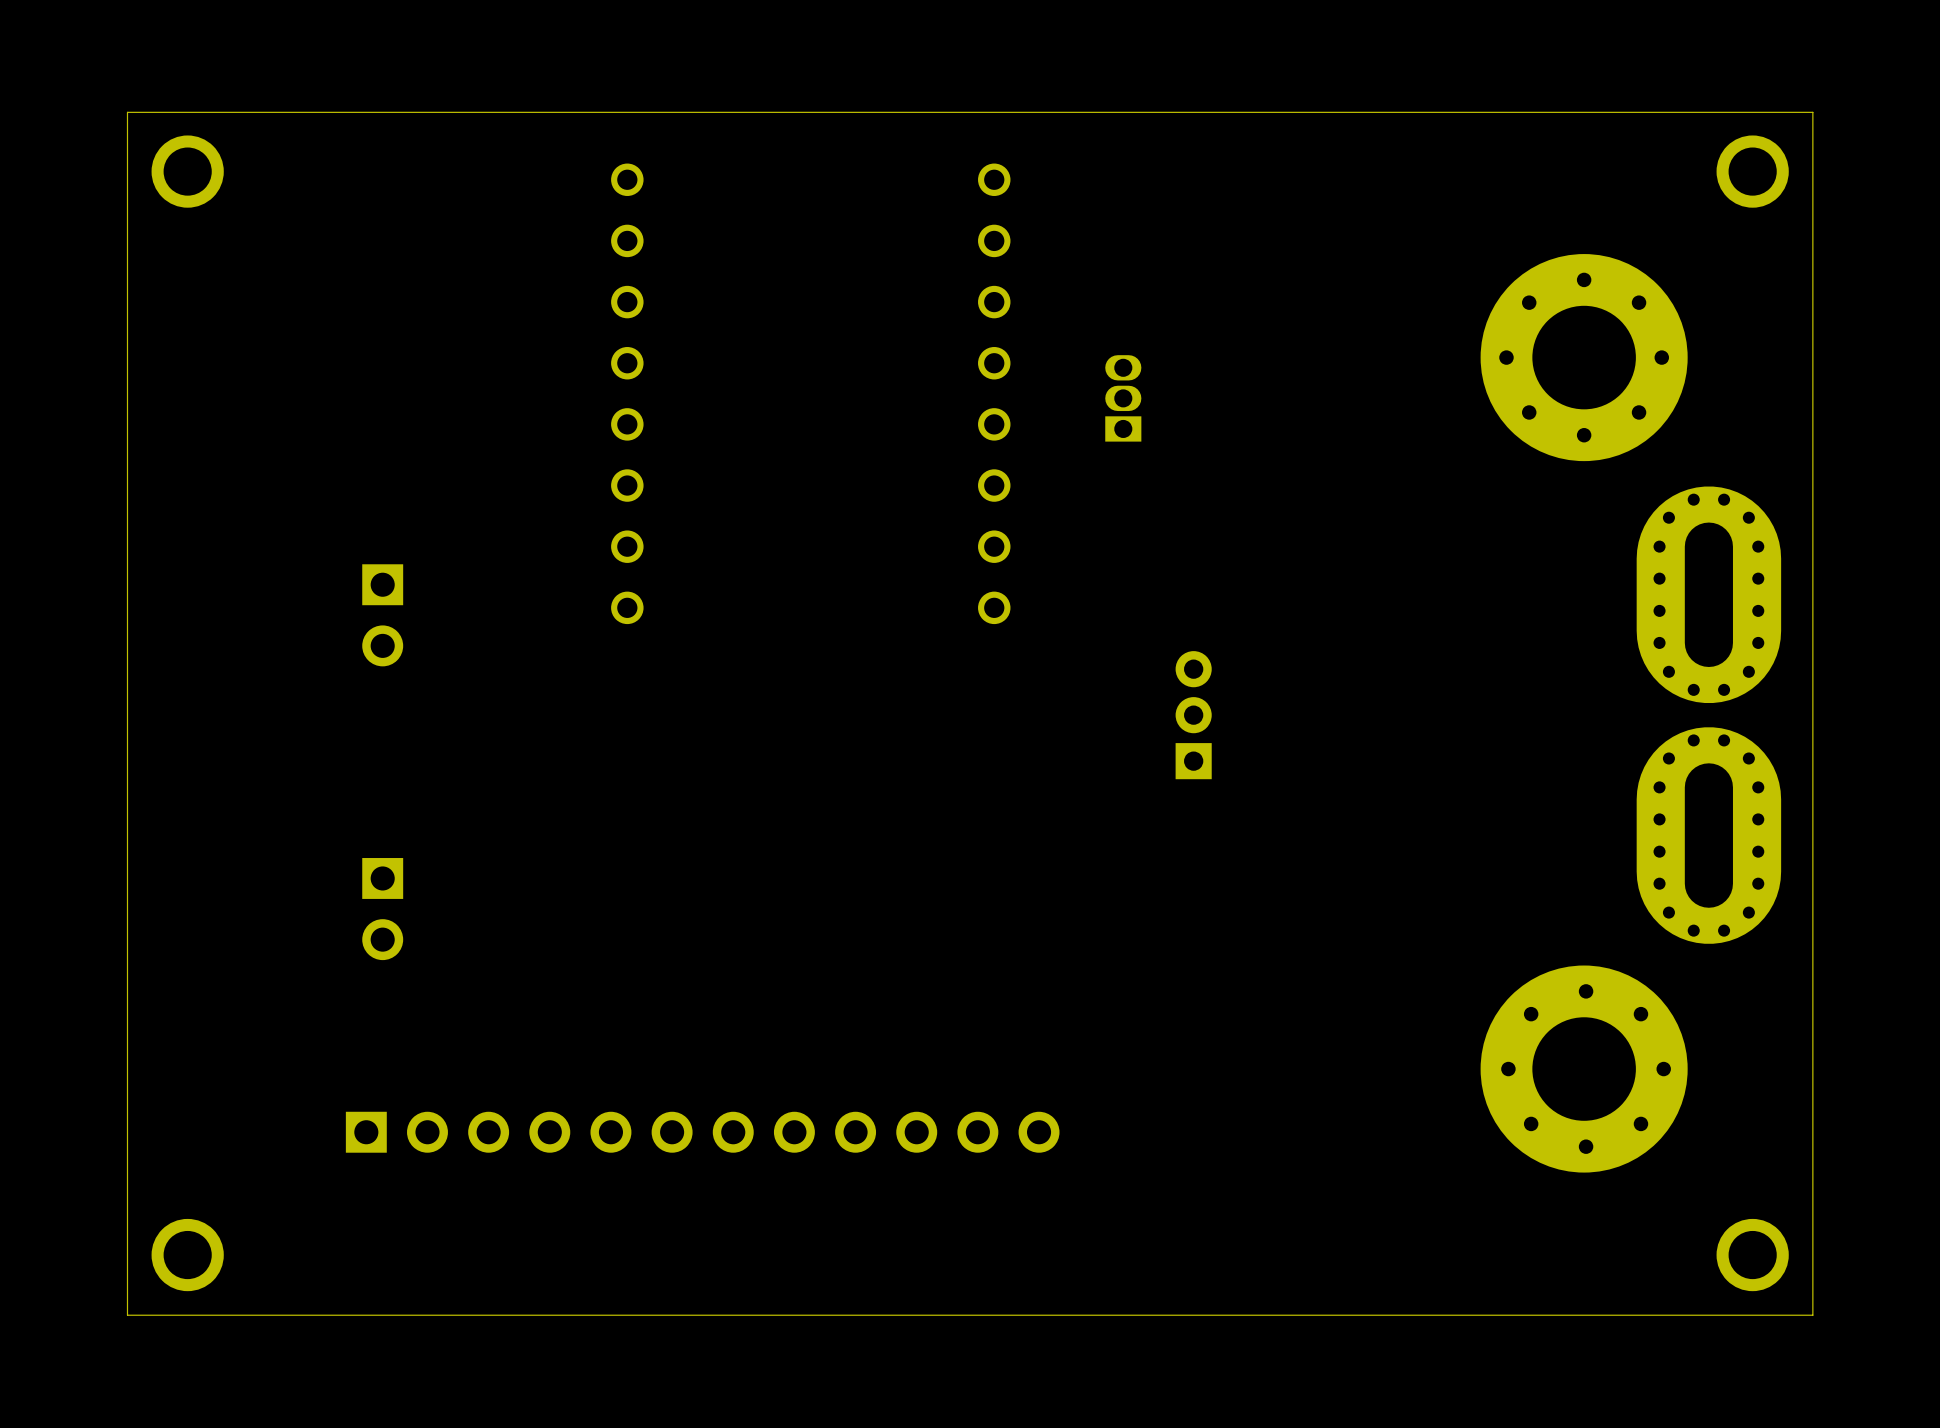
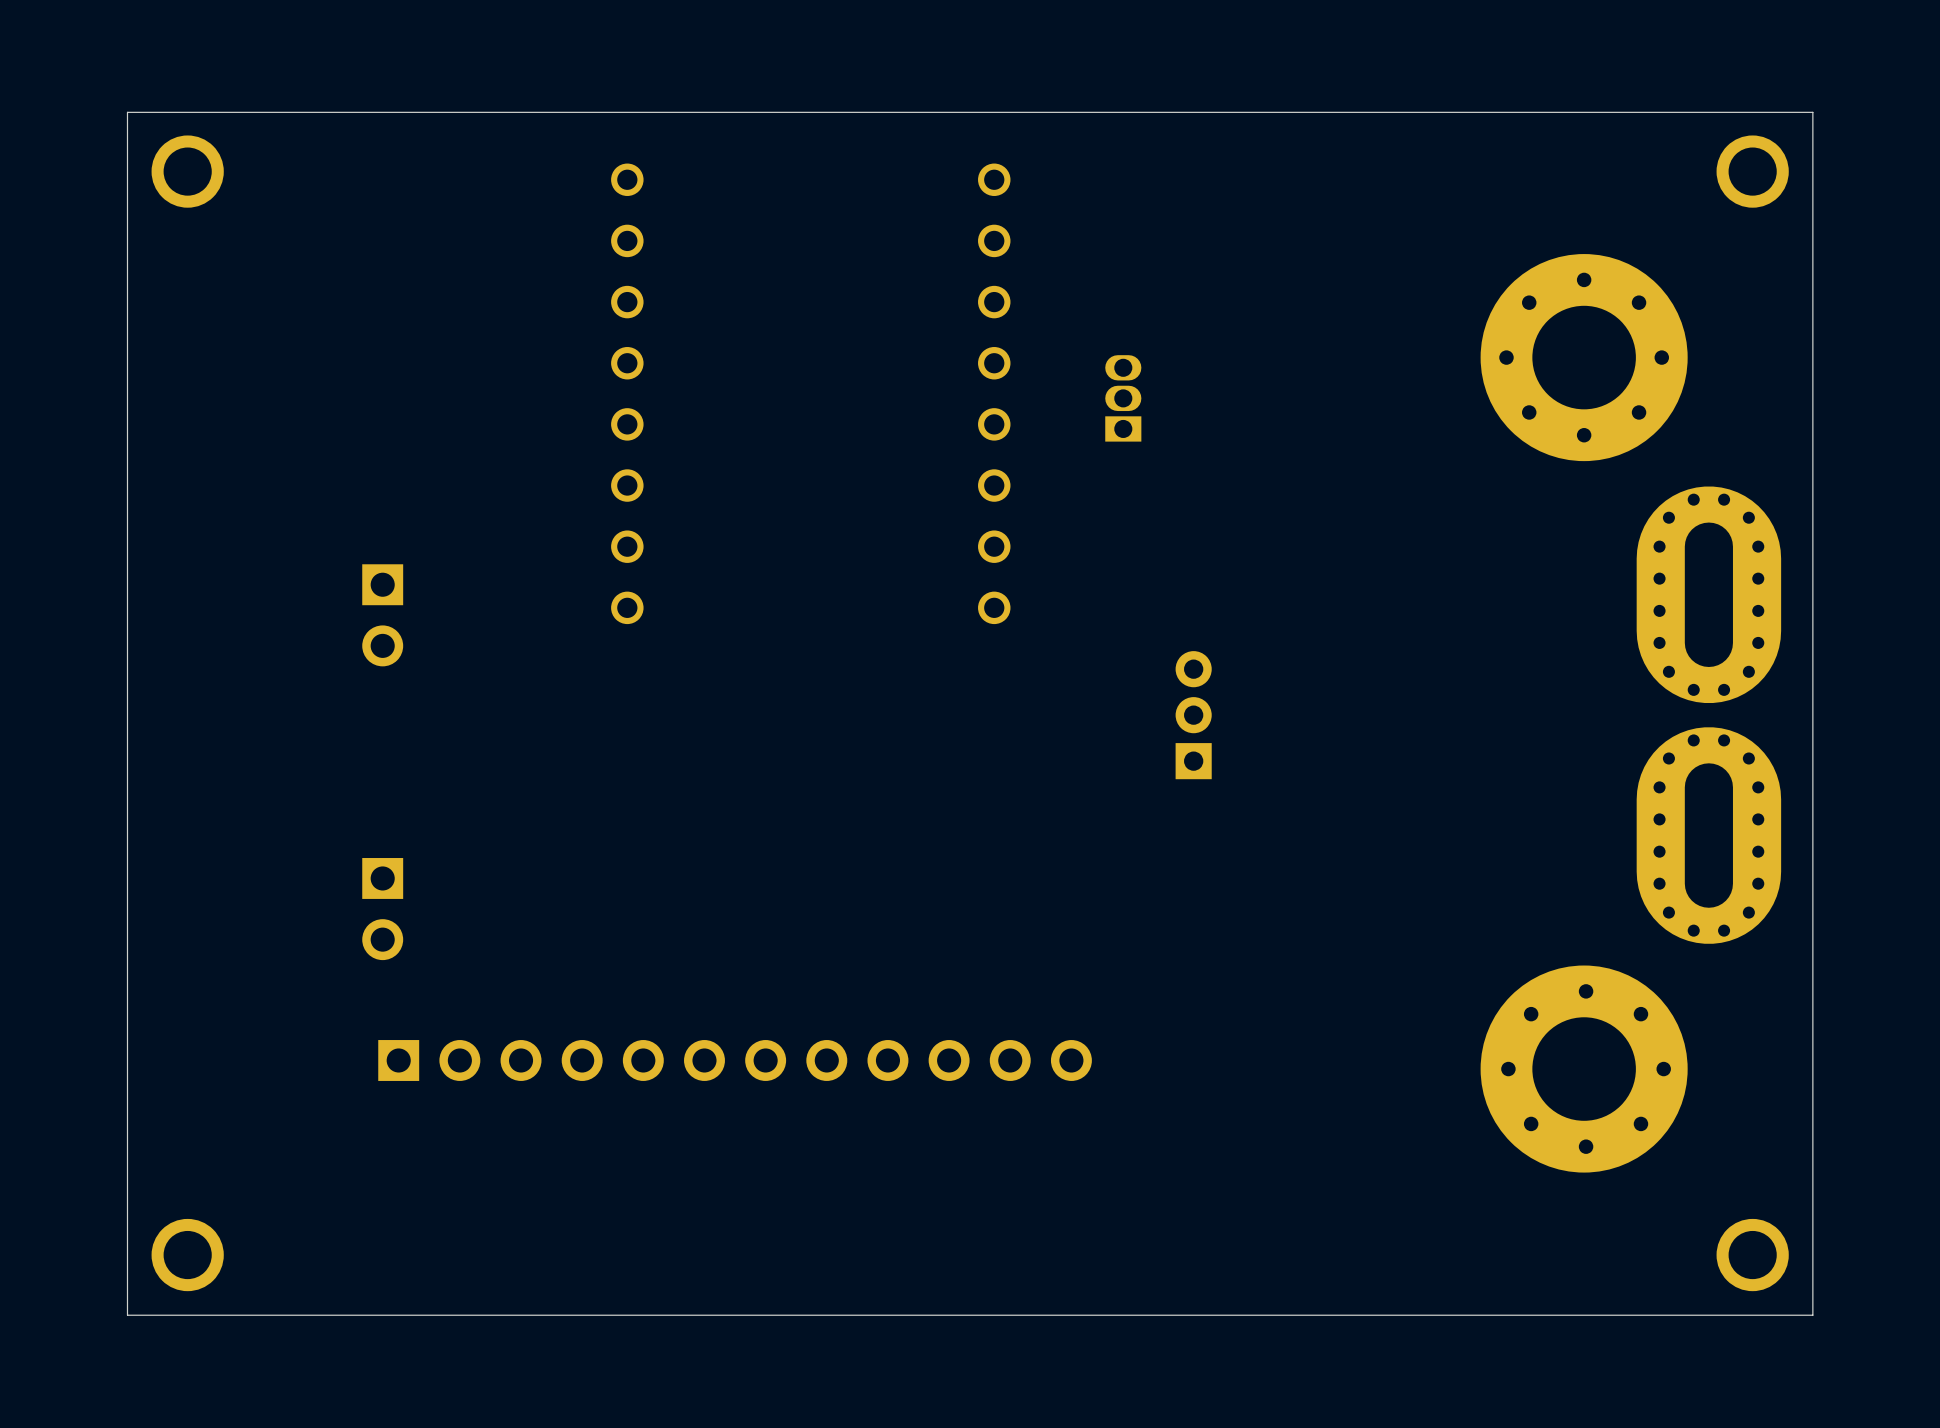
part position: (702, 1132) -> (735, 1060)

